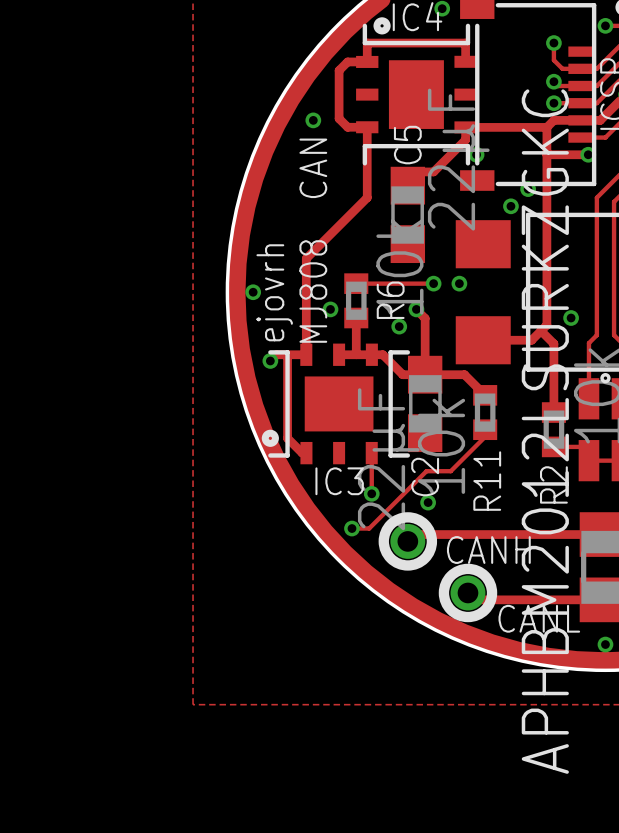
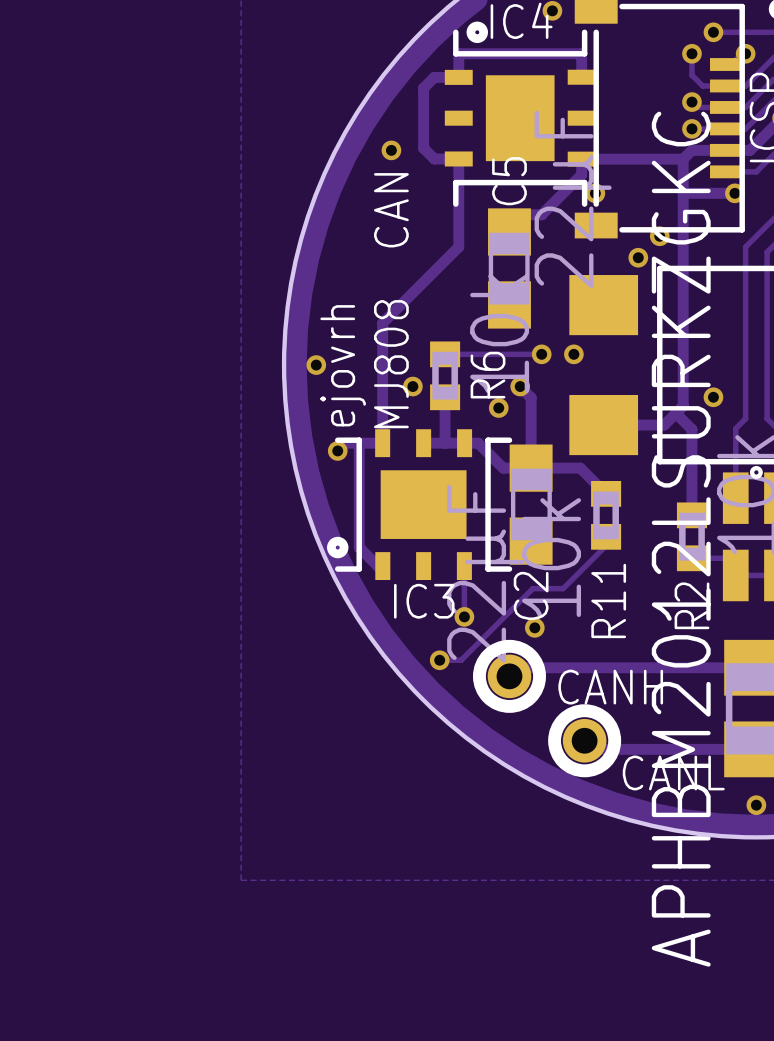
track: none -> (713, 32) (756, 32)
via: none -> (713, 32)
via: (605, 25) -> none
via: none -> (745, 53)

